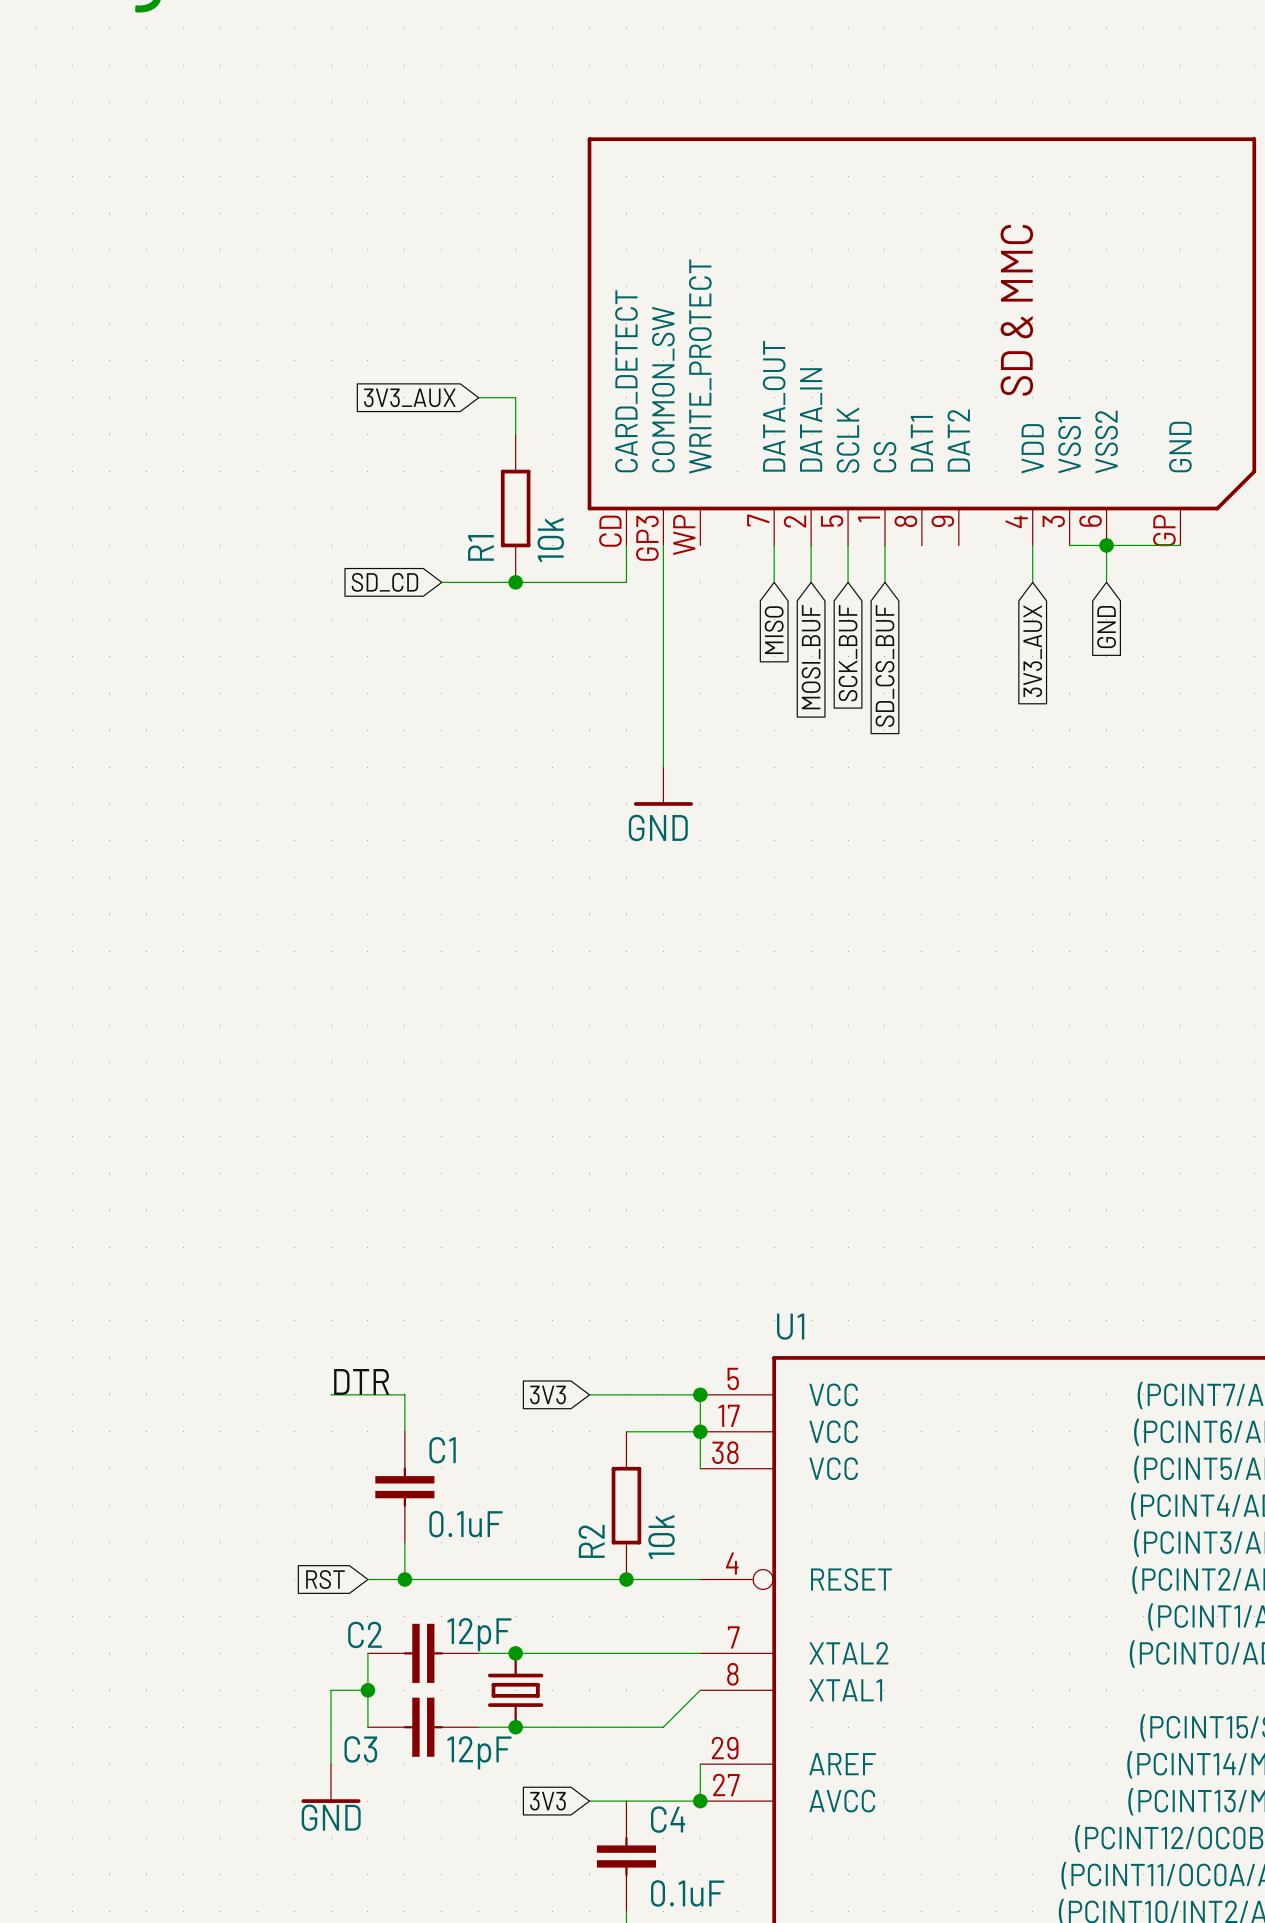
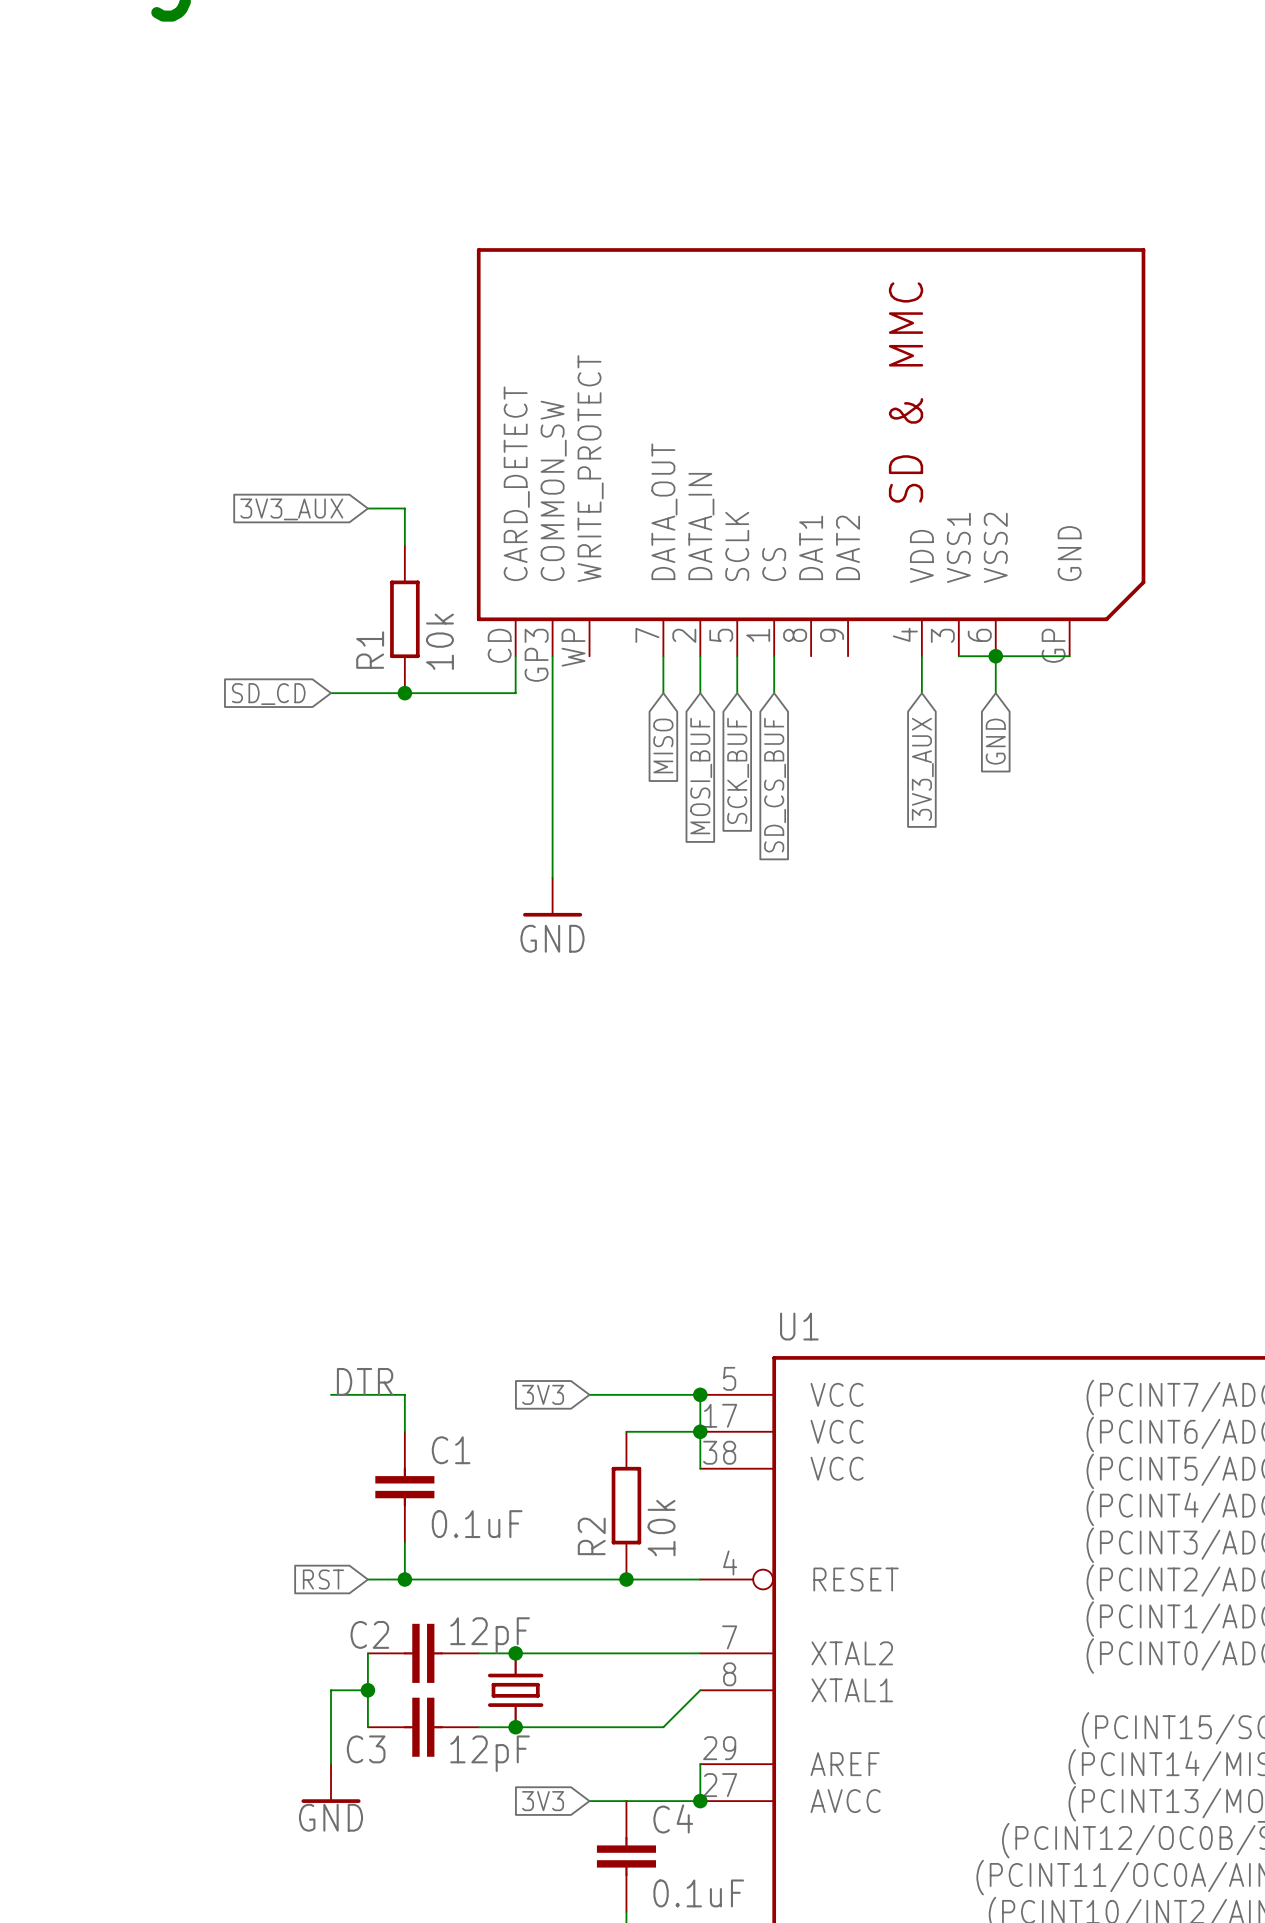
part position: (921, 341) -> (811, 452)
global label position: 3V3_AUX (409, 397) -> 3V3_AUX (291, 509)
wire: (478, 397) (515, 397) (515, 434) -> (367, 508) (404, 508) (404, 545)
R1 position: (515, 508) -> (404, 619)
wire: (626, 545) (626, 582) (441, 582) -> (515, 656) (515, 693) (331, 693)
wire: (663, 545) (663, 656) -> none
wire: (774, 545) (774, 582) -> none
wire: (811, 545) (811, 582) -> (700, 656) (700, 693)
wire: (848, 545) (848, 582) -> (737, 656) (737, 693)
wire: (884, 545) (884, 582) -> (774, 656) (774, 693)
wire: (1032, 545) (1032, 582) -> (921, 656) (921, 693)
wire: (1069, 545) (1180, 545) -> (958, 656) (1069, 656)
wire: (1106, 545) (1106, 582) -> (995, 656) (995, 693)
junction: (1106, 545) -> none
global label position: SD_CD (384, 582) -> SD_CD (268, 694)
junction: (515, 582) -> none
global label position: GND (1106, 627) -> GND (995, 741)
global label position: MISO (774, 630) -> MISO (663, 745)
global label position: 3V3_AUX (1032, 651) -> 3V3_AUX (922, 769)
global label position: SCK_BUF (848, 653) -> SCK_BUF (738, 770)
wire: none -> (552, 656) (552, 877)
junction: none -> (995, 656)
global label position: MOSI_BUF (811, 657) -> MOSI_BUF (701, 776)
global label position: SD_CS_BUF (884, 665) -> SD_CS_BUF (775, 785)
junction: none -> (404, 693)
wire: (663, 693) (663, 767) -> none
power symbol position: GND (663, 786) -> GND (552, 897)

